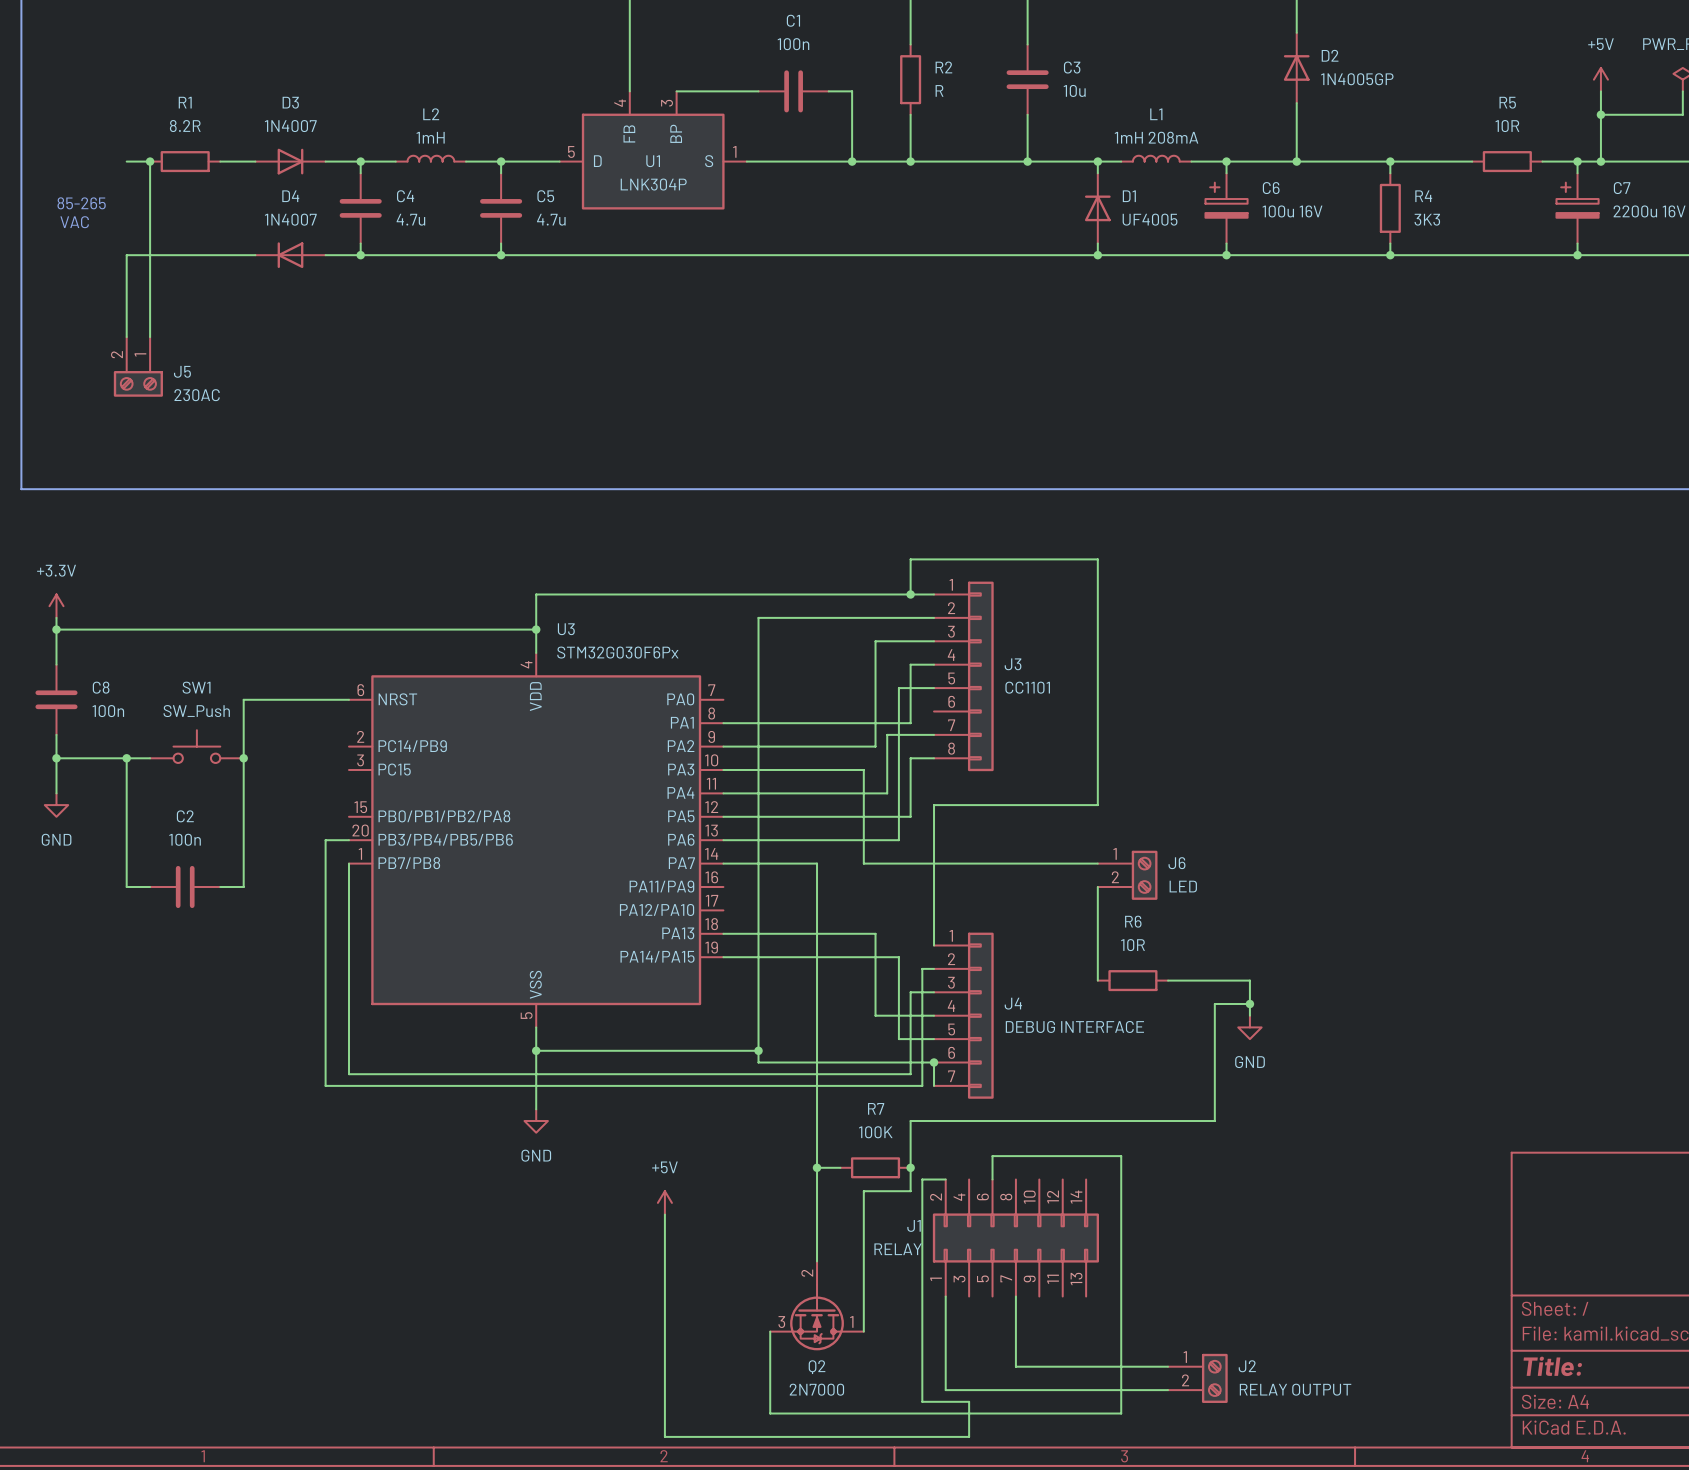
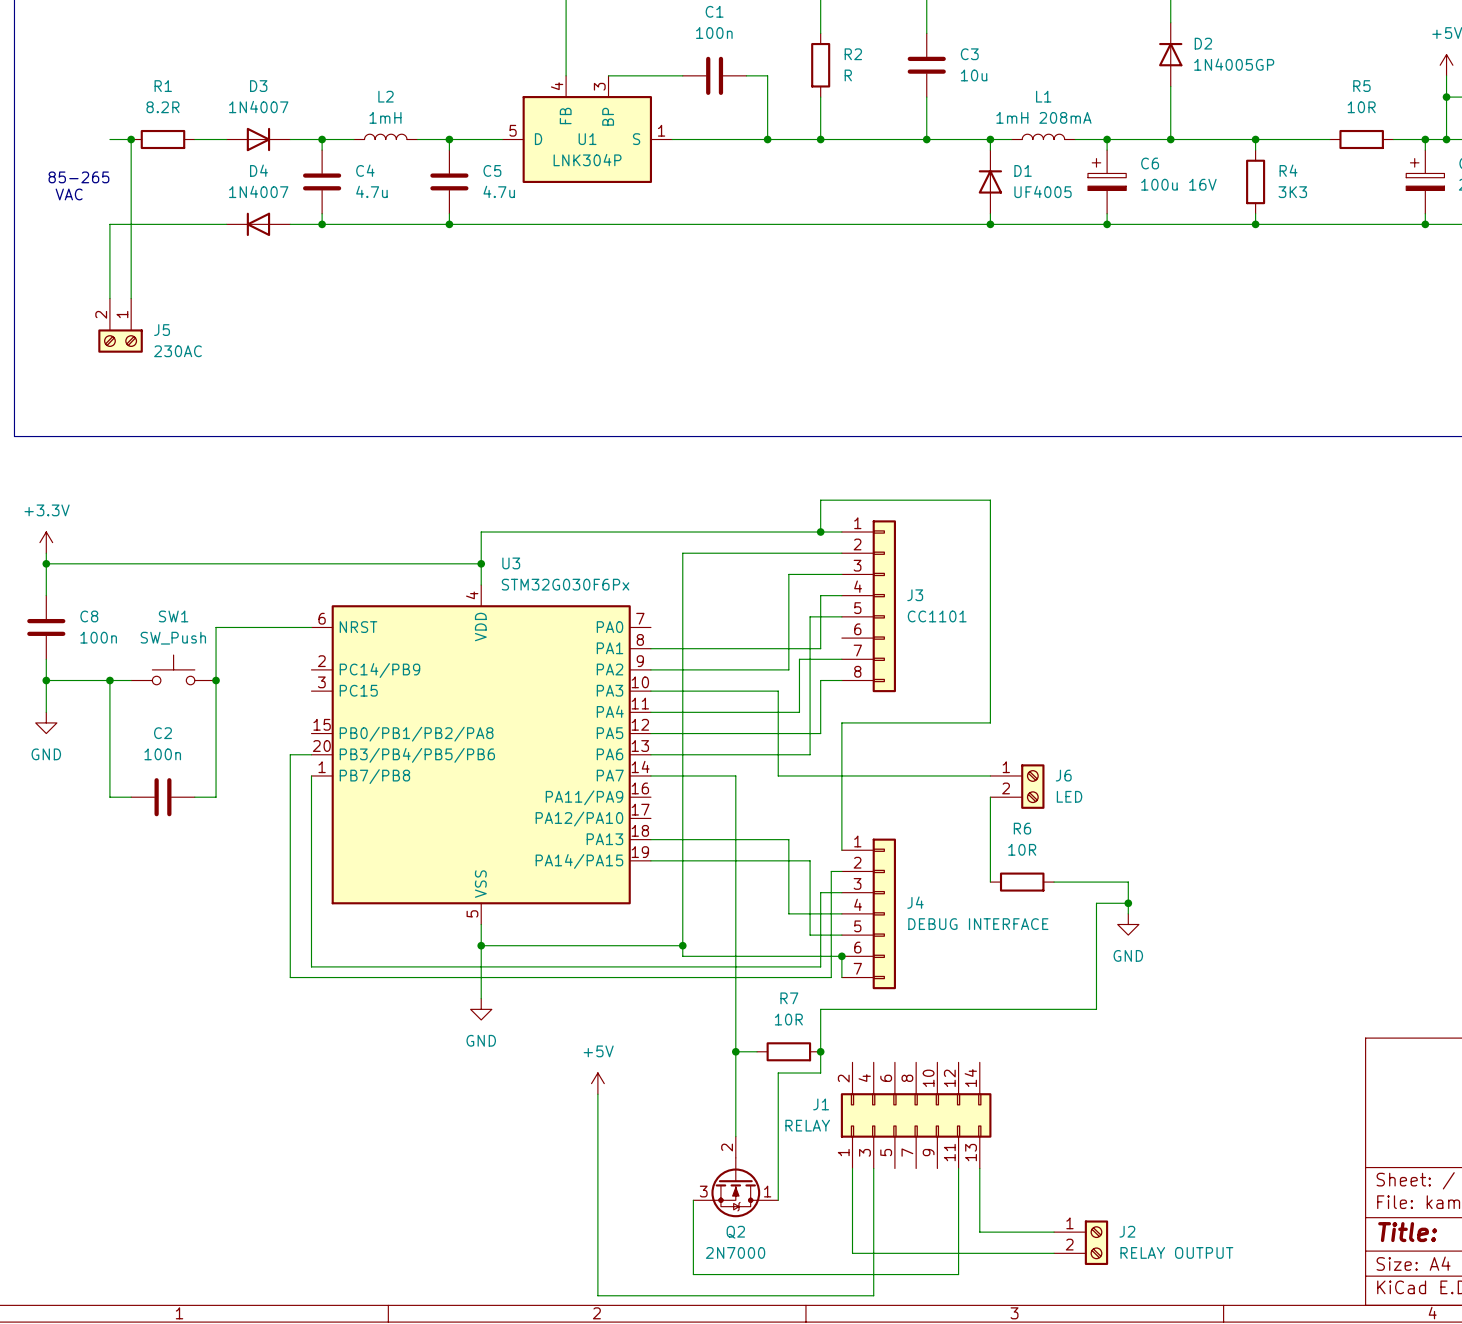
R7 value: 100K (875, 1132) -> 10R (788, 1019)
wire: (945, 1179) (922, 1179) (922, 1401) (969, 1401) -> (873, 1168) (873, 1263)
wire: (992, 1179) (992, 1156) (1121, 1156) (1121, 1413) (1062, 1413) -> (958, 1168) (958, 1274)
wire: (1015, 1296) (1015, 1366) (1086, 1366) -> (979, 1168) (979, 1232)

